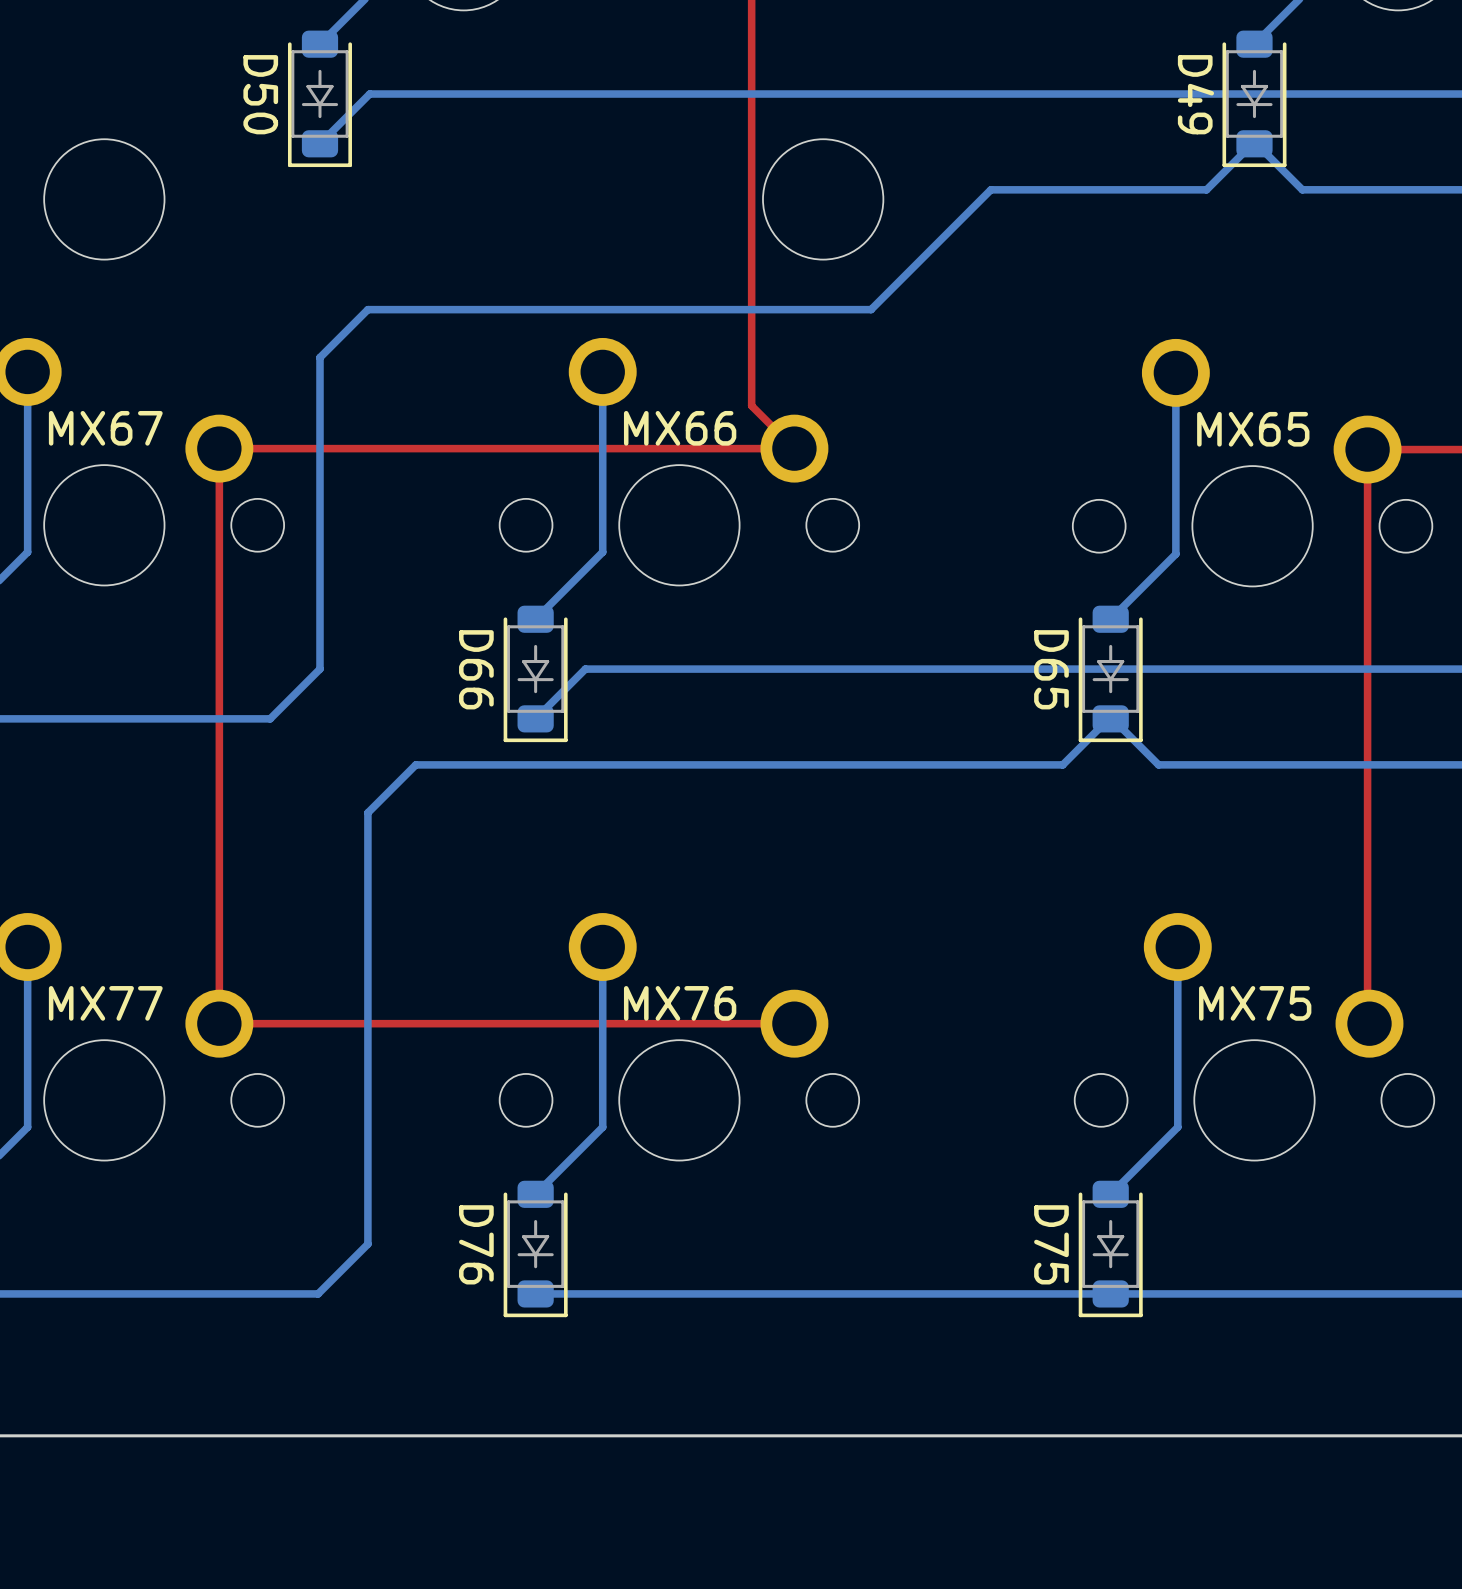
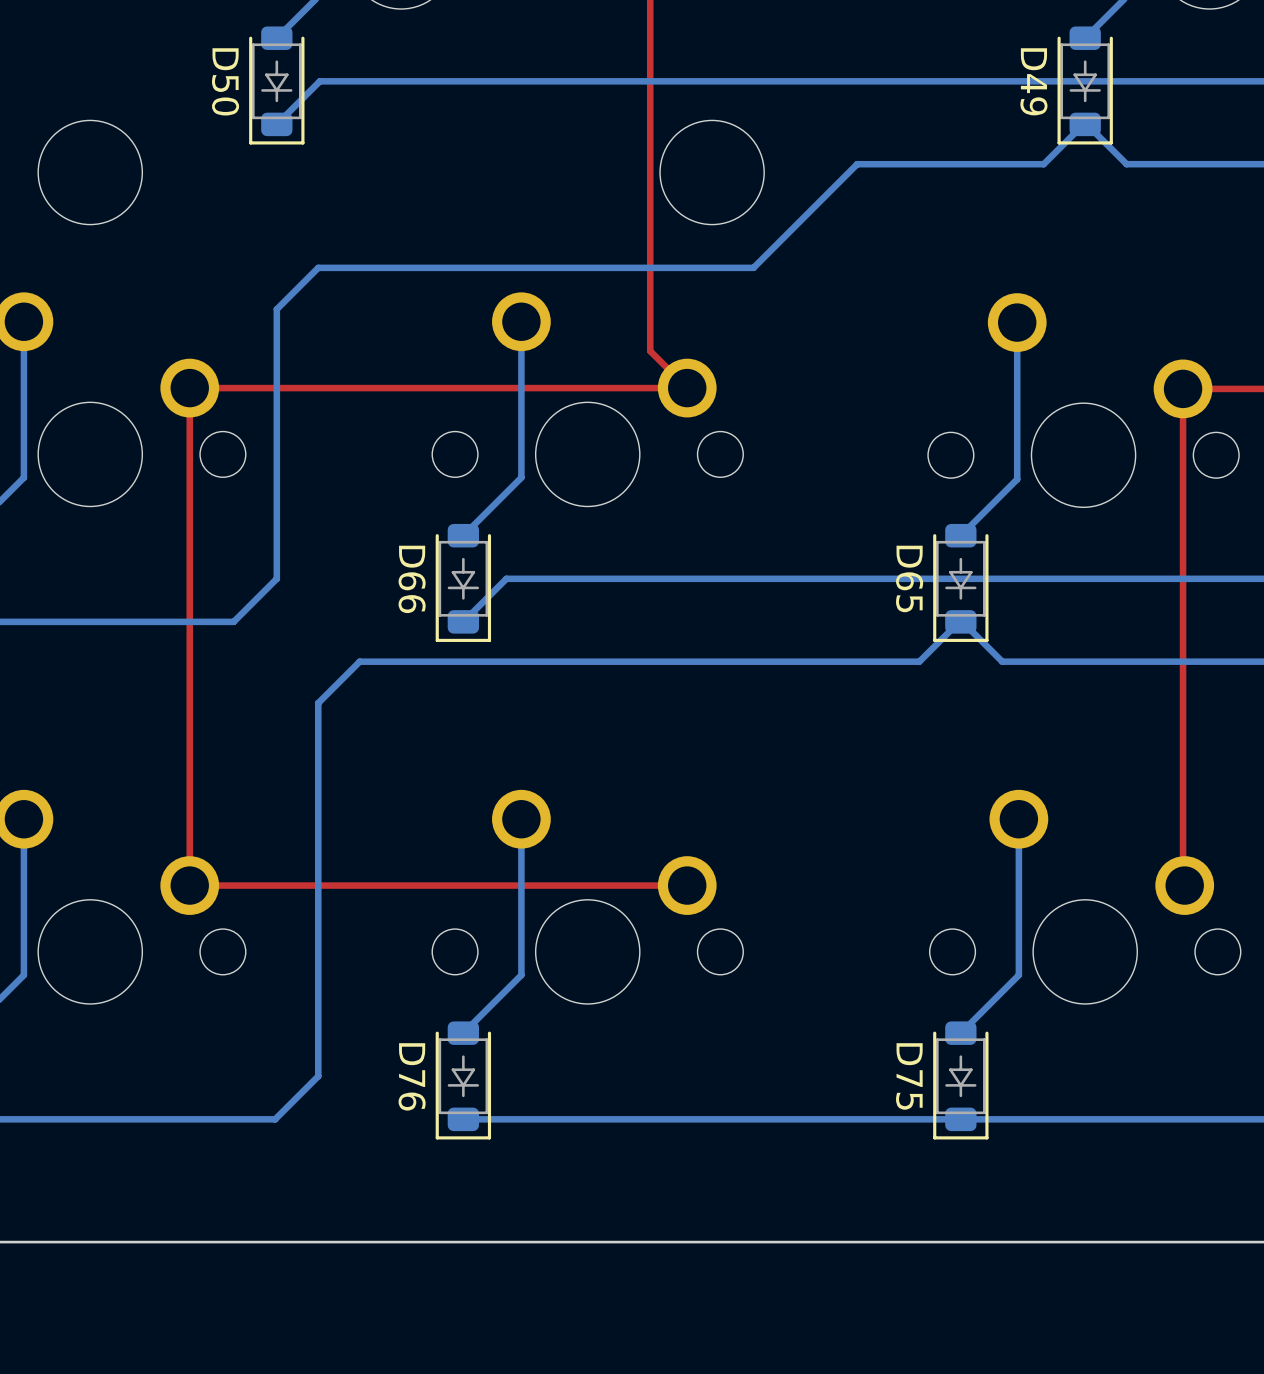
MX67 name: MX67 (105, 428) -> none
MX66 name: MX66 (680, 428) -> none
MX65 name: MX65 (1253, 429) -> none
MX77 name: MX77 (105, 1003) -> none
MX76 name: MX76 (680, 1003) -> none
MX75 name: MX75 (1255, 1003) -> none

